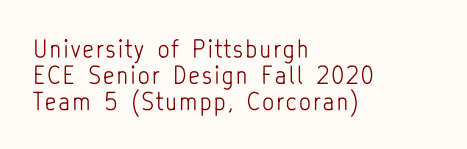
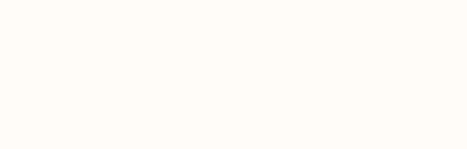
text: University of Pittsburgh (170, 51) -> none
text: ECE Senior Design Fall 2020 (203, 77) -> none
text: Team 5 (Stumpp, Corcoran) (194, 103) -> none

